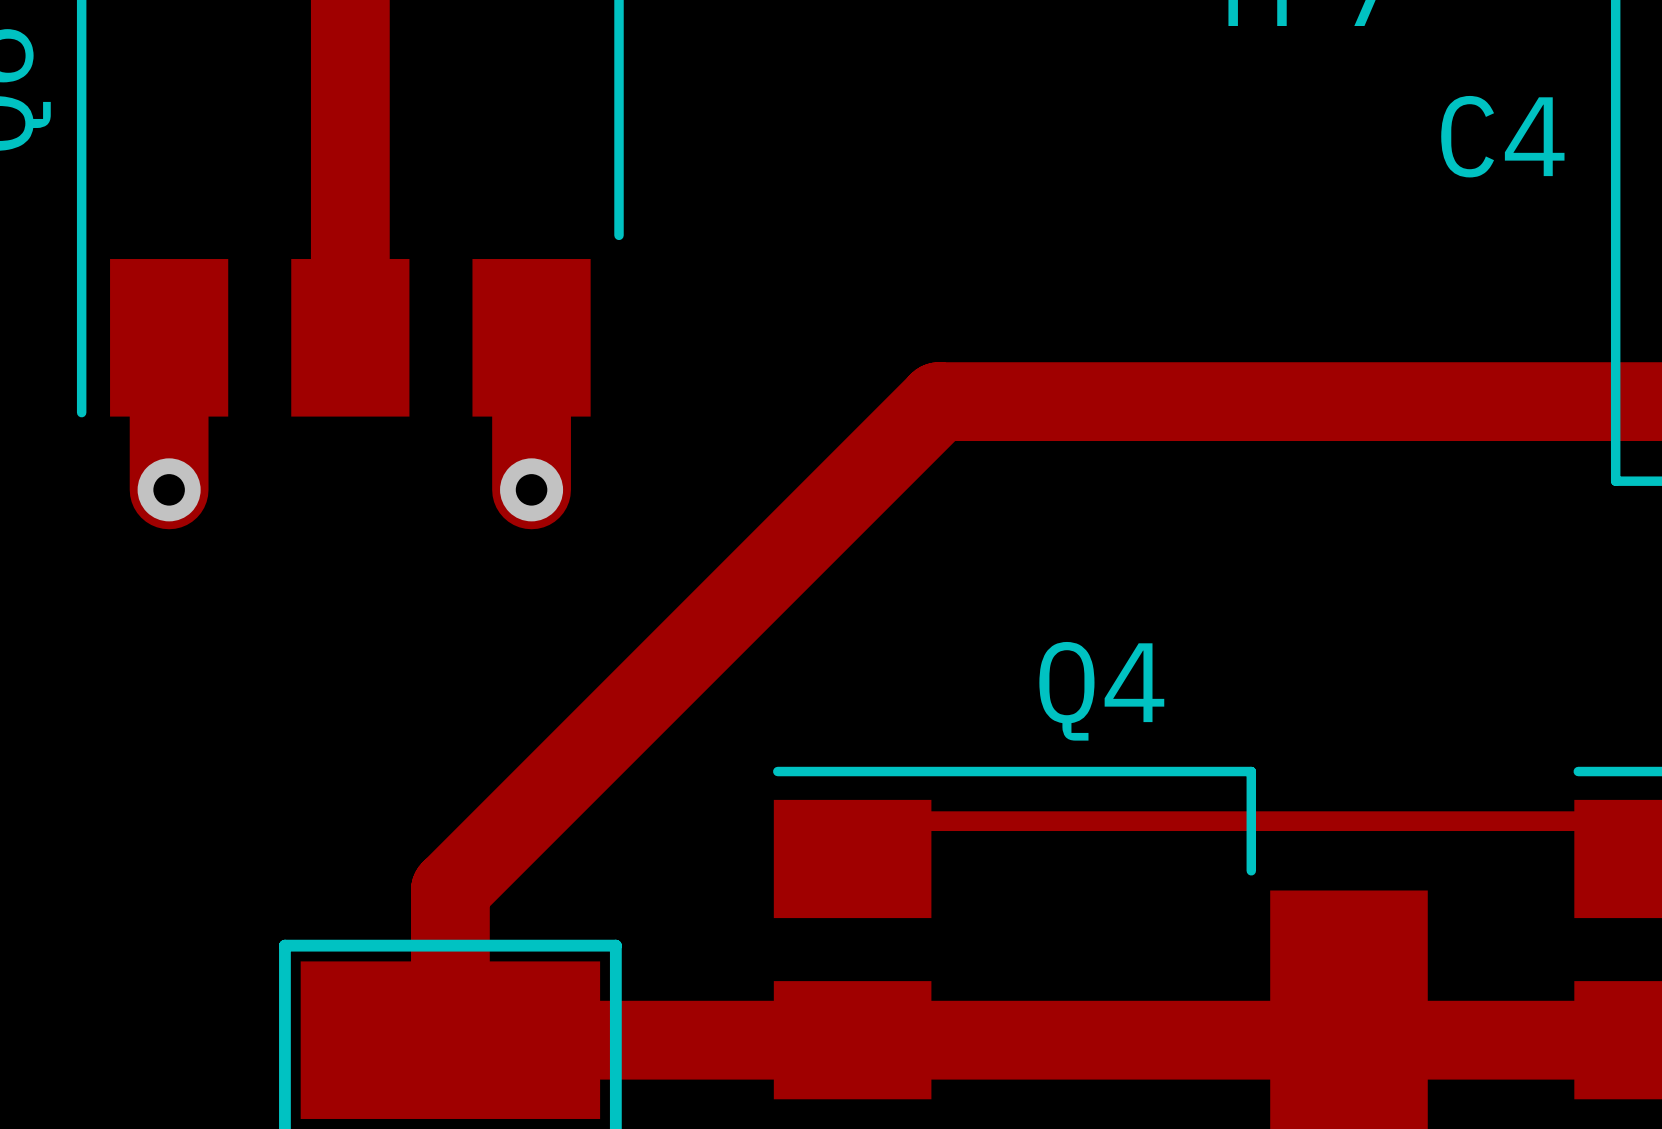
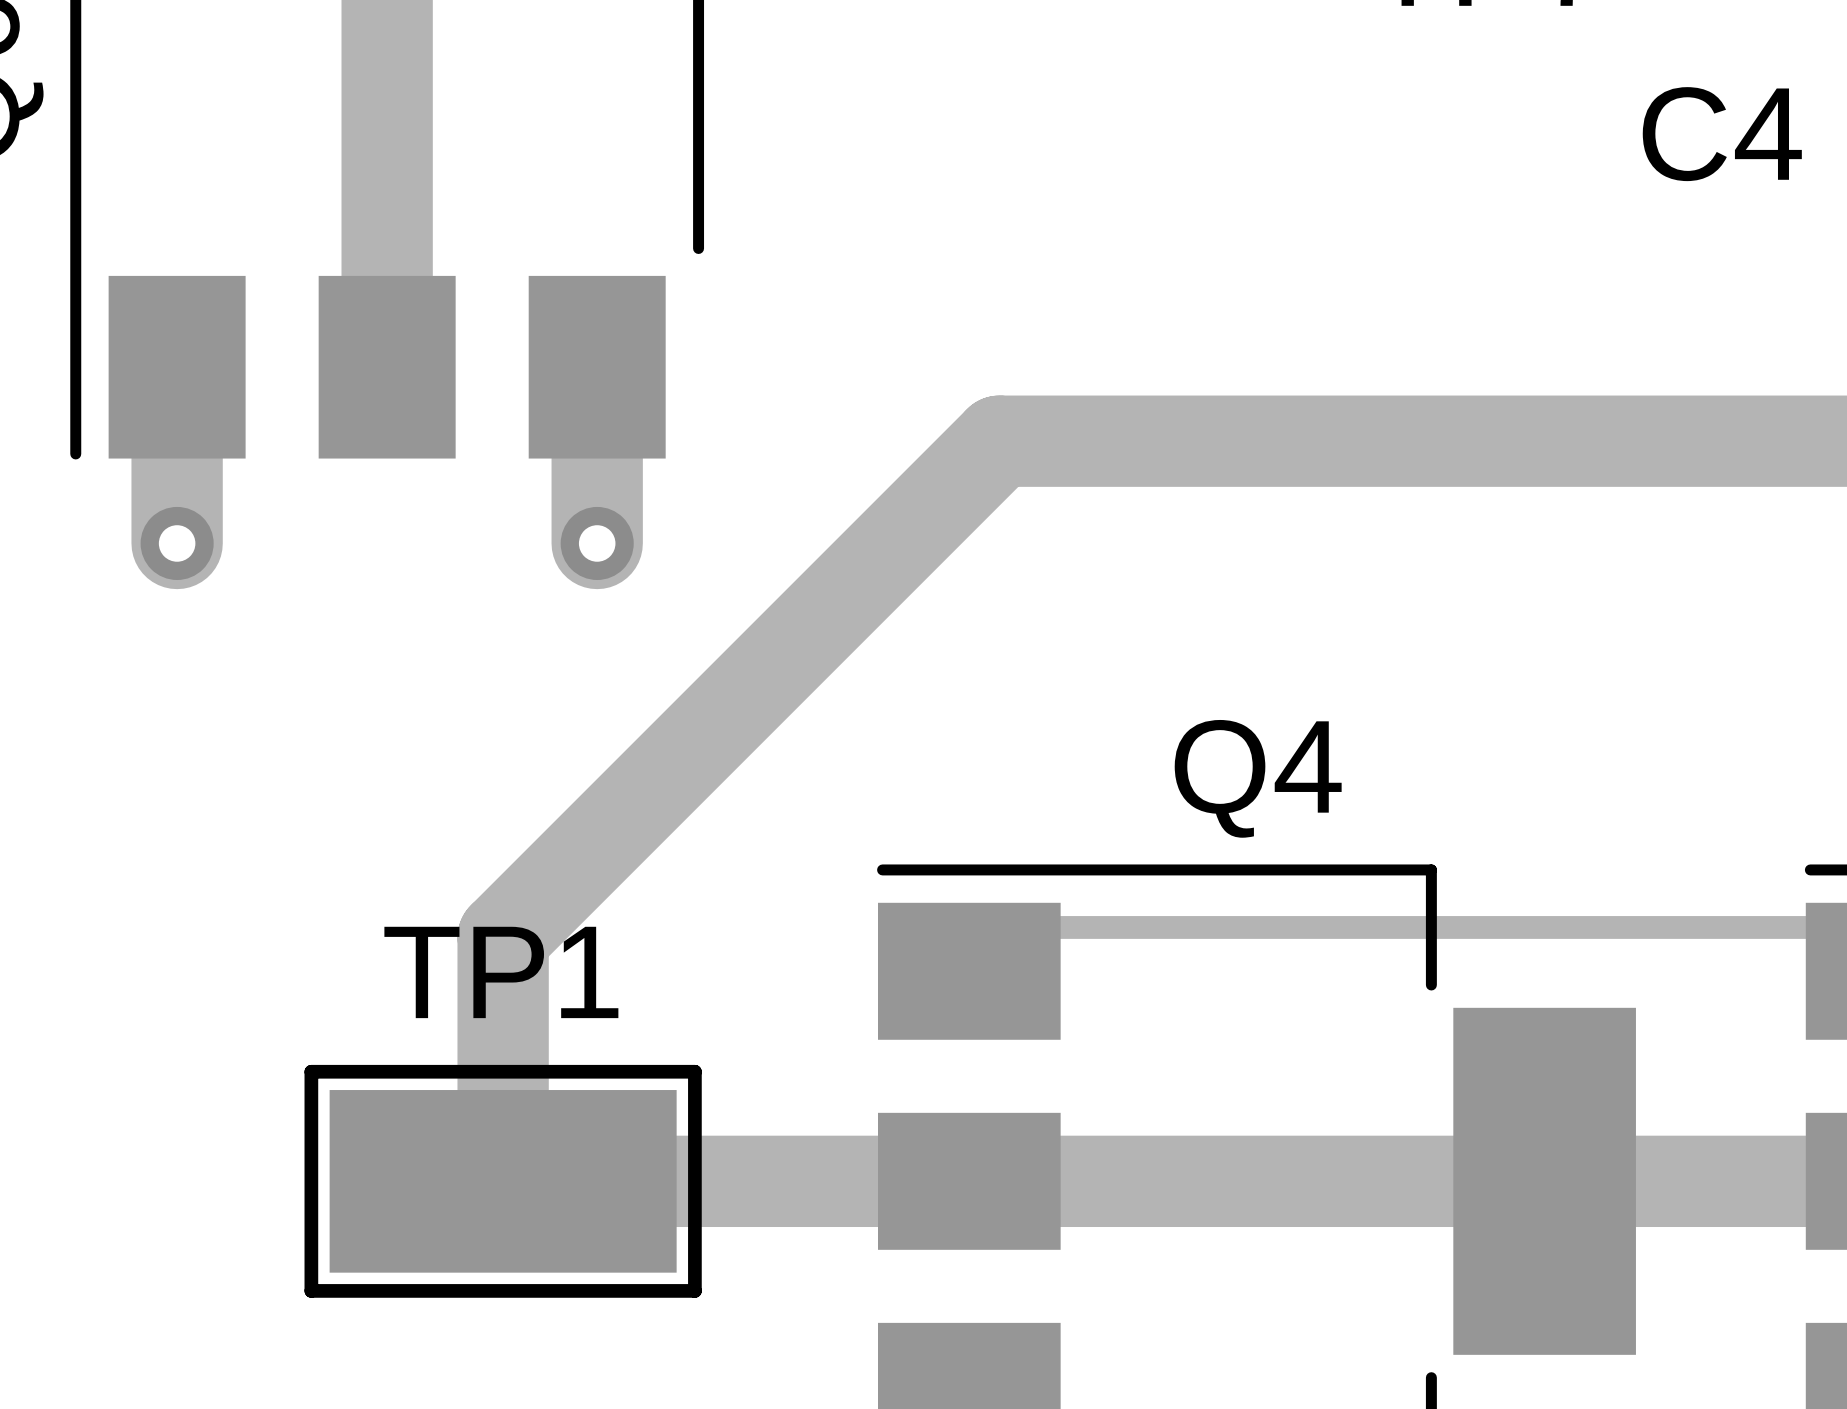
track: (938, 401) (450, 890) -> (1069, 441) (999, 441) (503, 937) (503, 1007)
TP1 name: none -> TP1 (501, 972)

